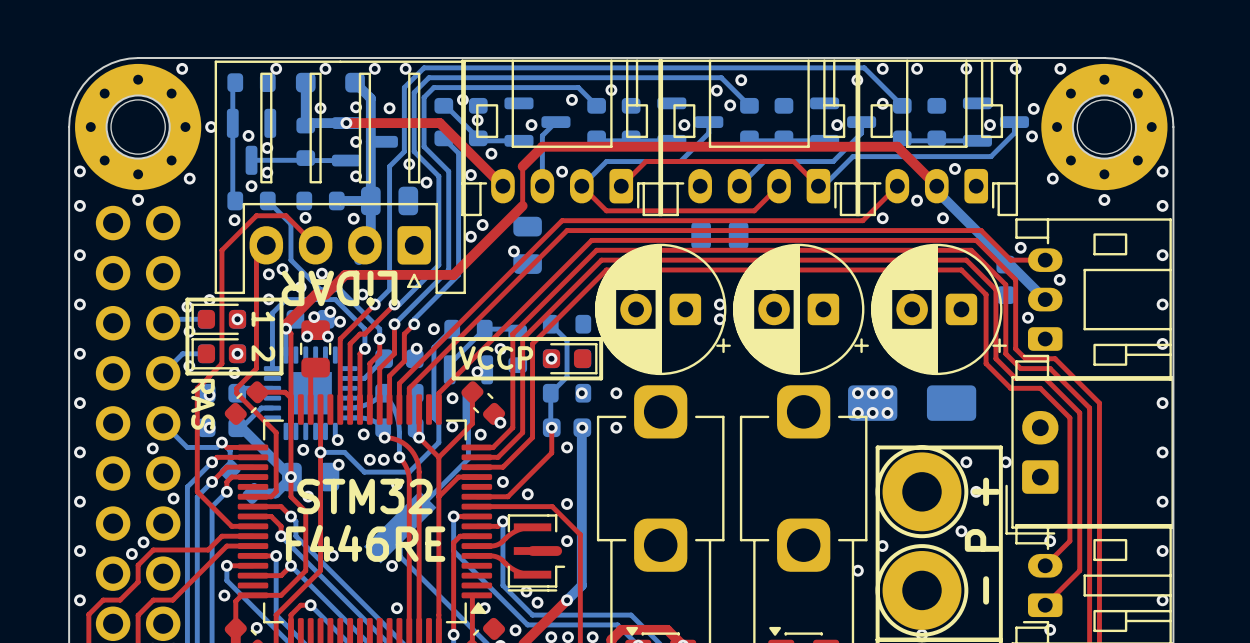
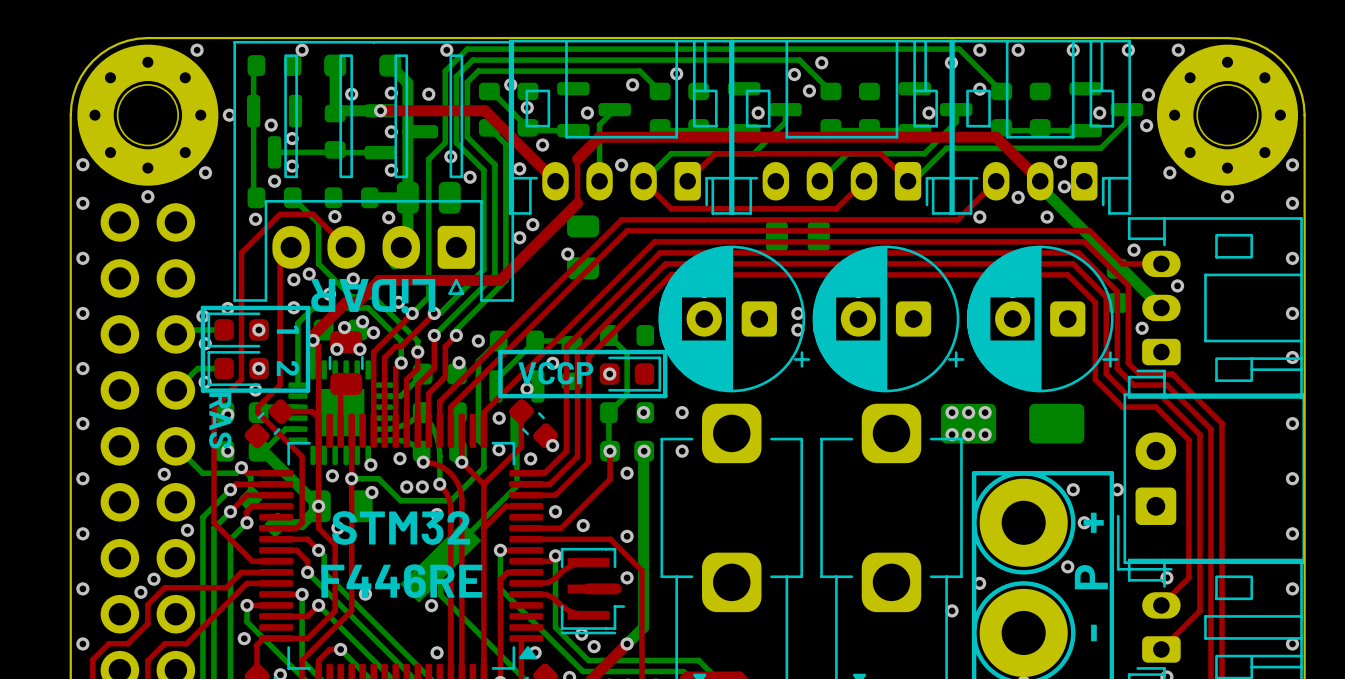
via: (325, 68) -> none
via: (374, 68) -> none
via: none -> (1064, 186)

